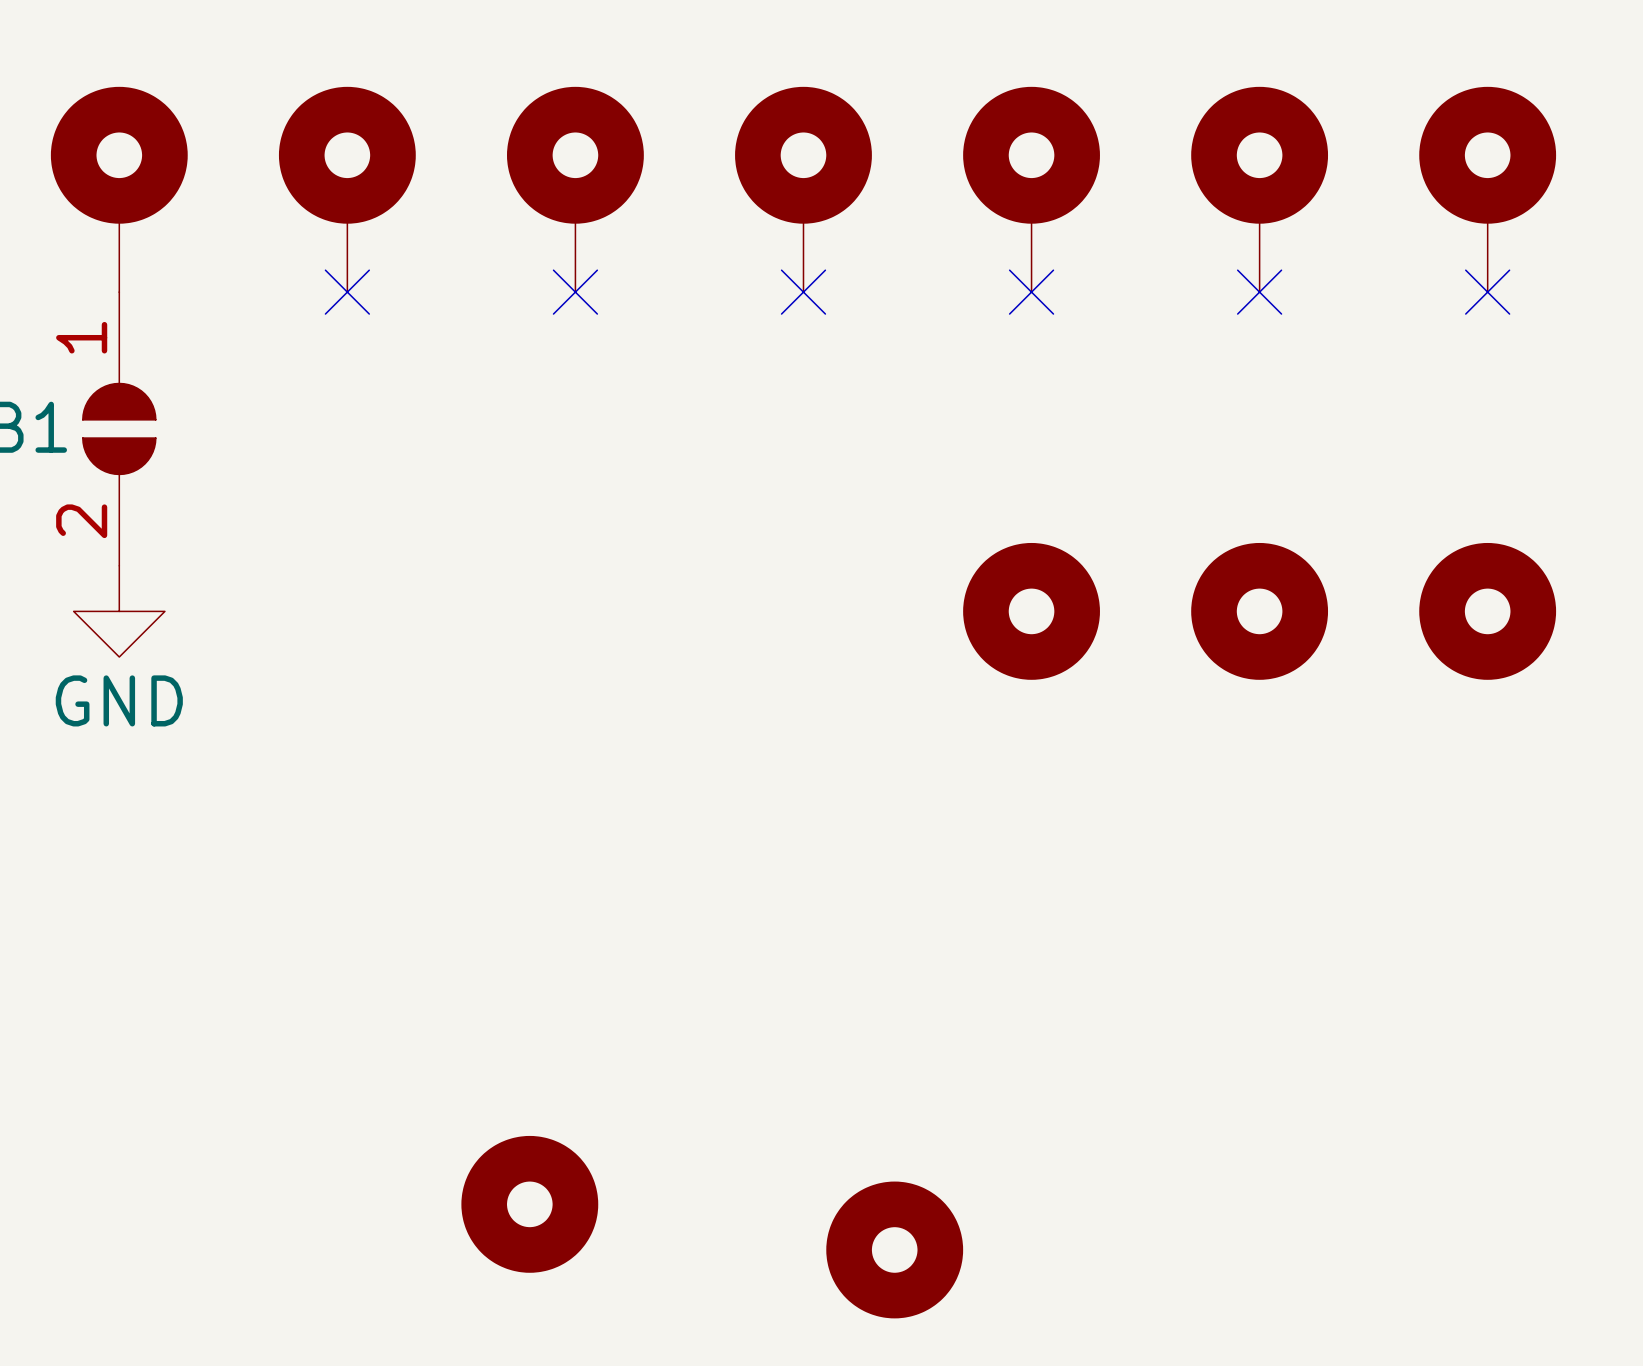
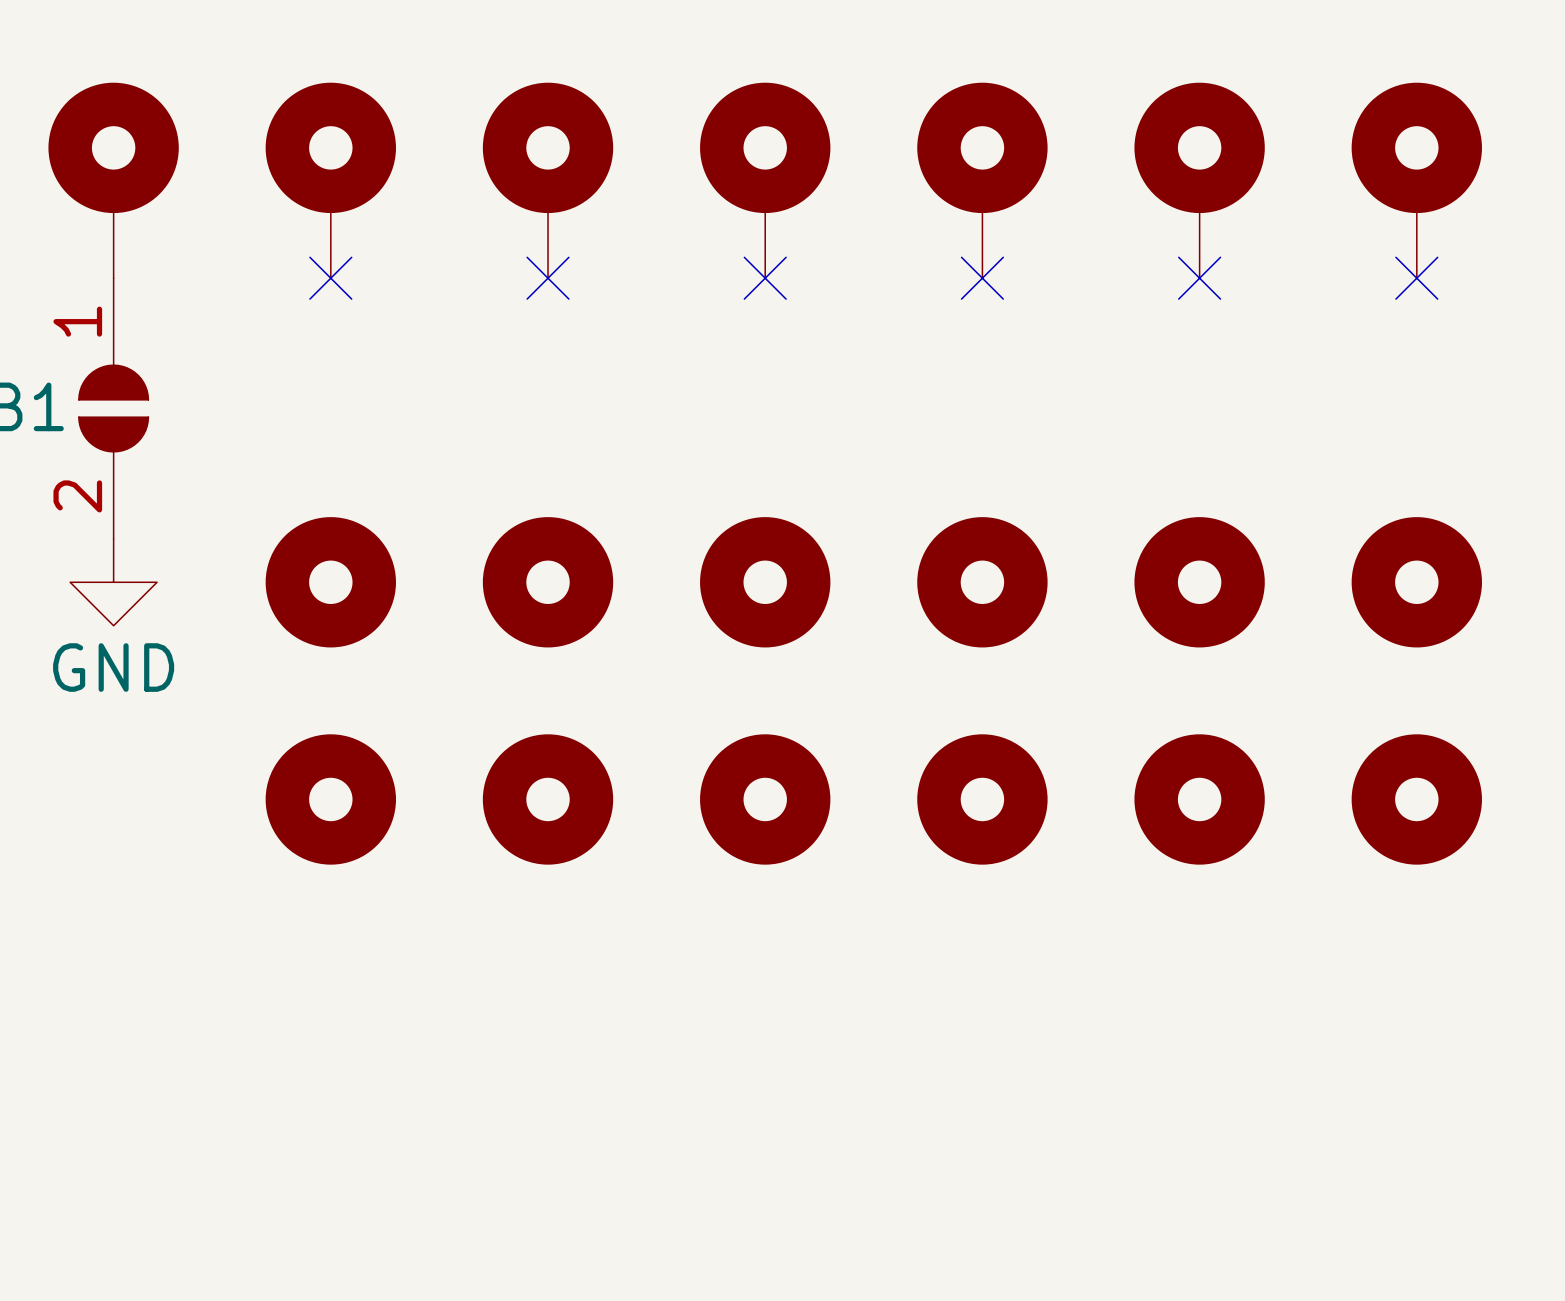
part: none -> (330, 582)
part: none -> (548, 582)
part: none -> (765, 582)
part: none -> (330, 799)
part: none -> (548, 799)
part: none -> (765, 799)
part: none -> (982, 799)
part: none -> (1199, 799)
part: none -> (1416, 799)
part: (529, 1204) -> none
part: (894, 1249) -> none

